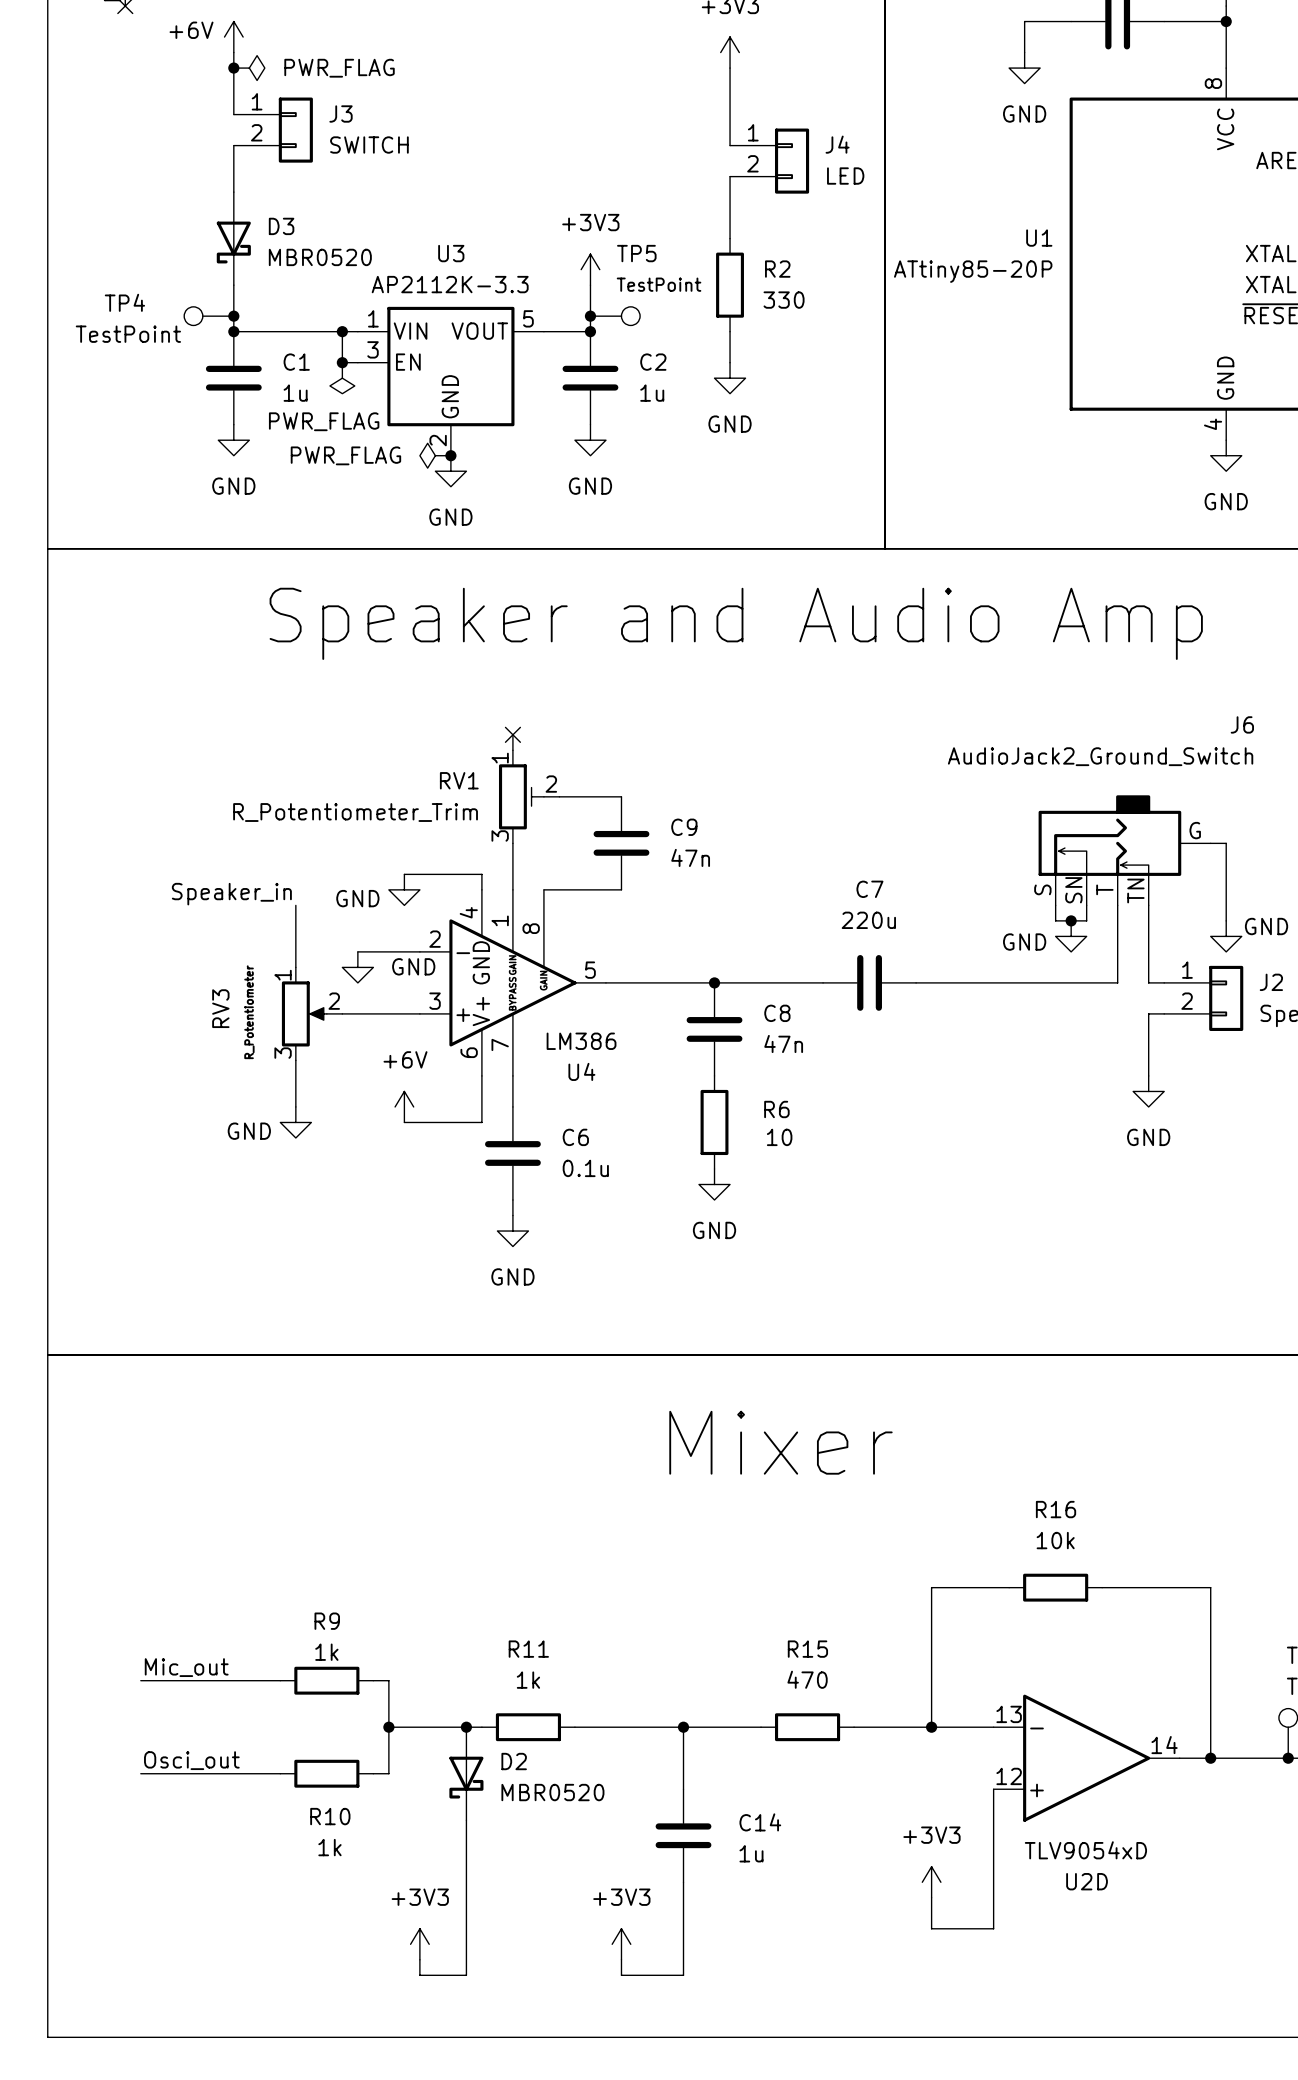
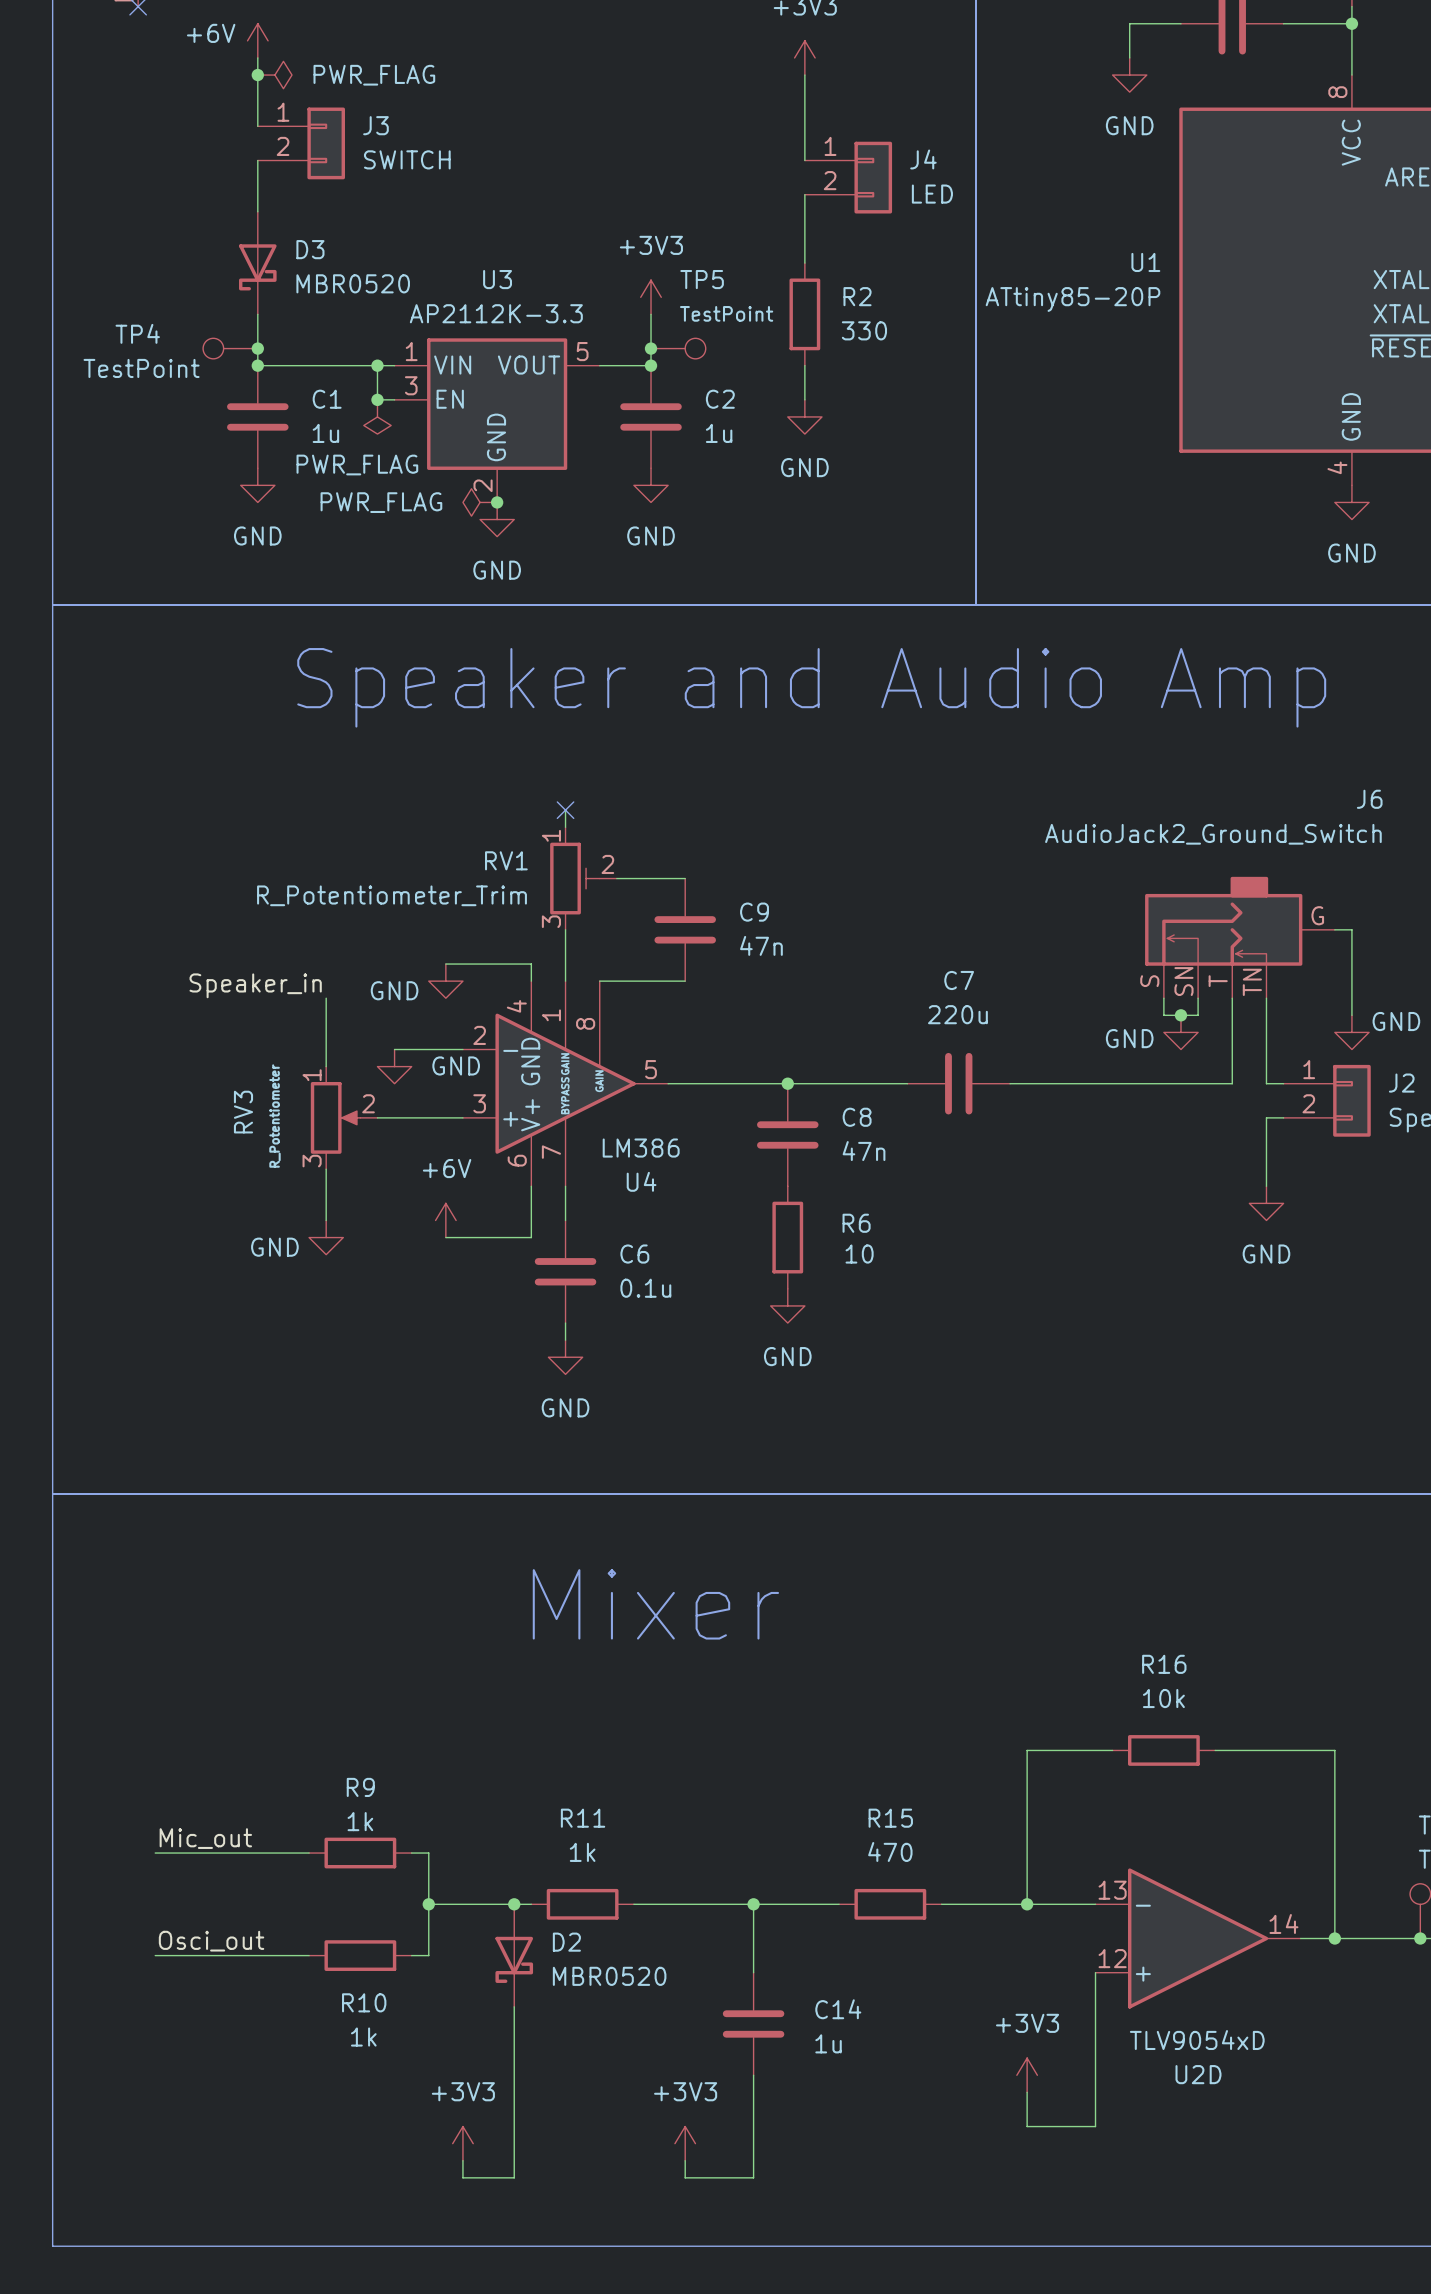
text position: Mixer (780, 1442) -> Mixer (655, 1604)

